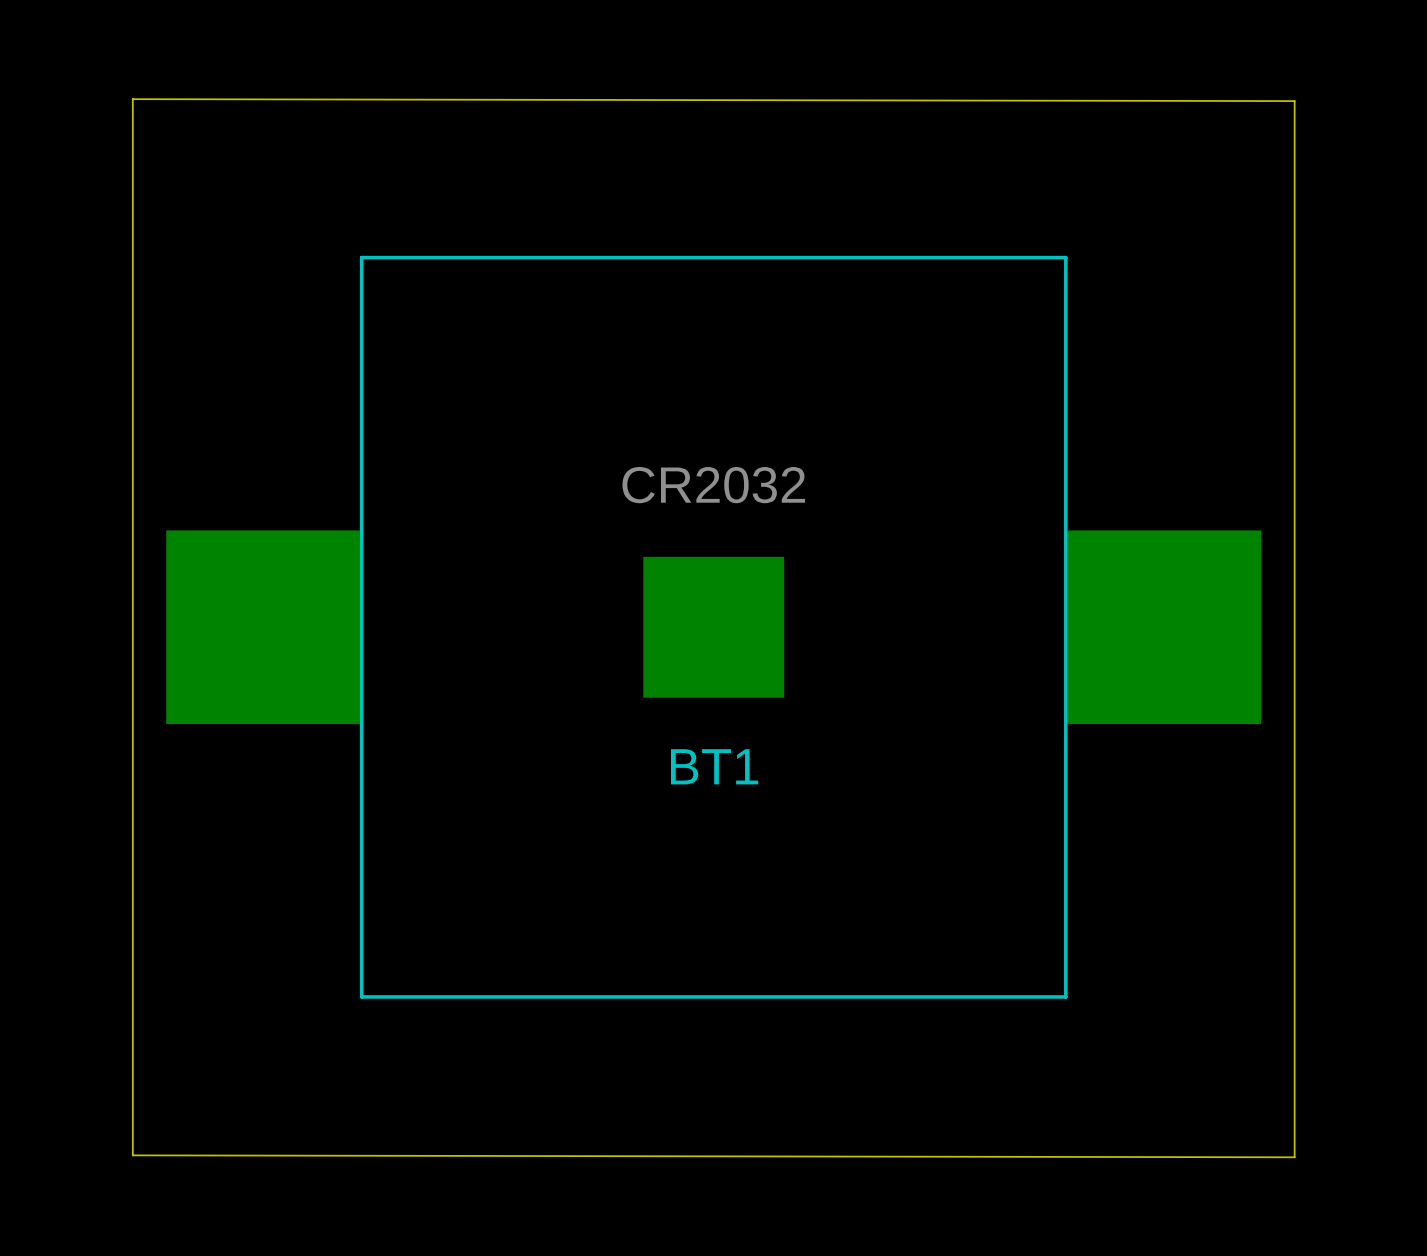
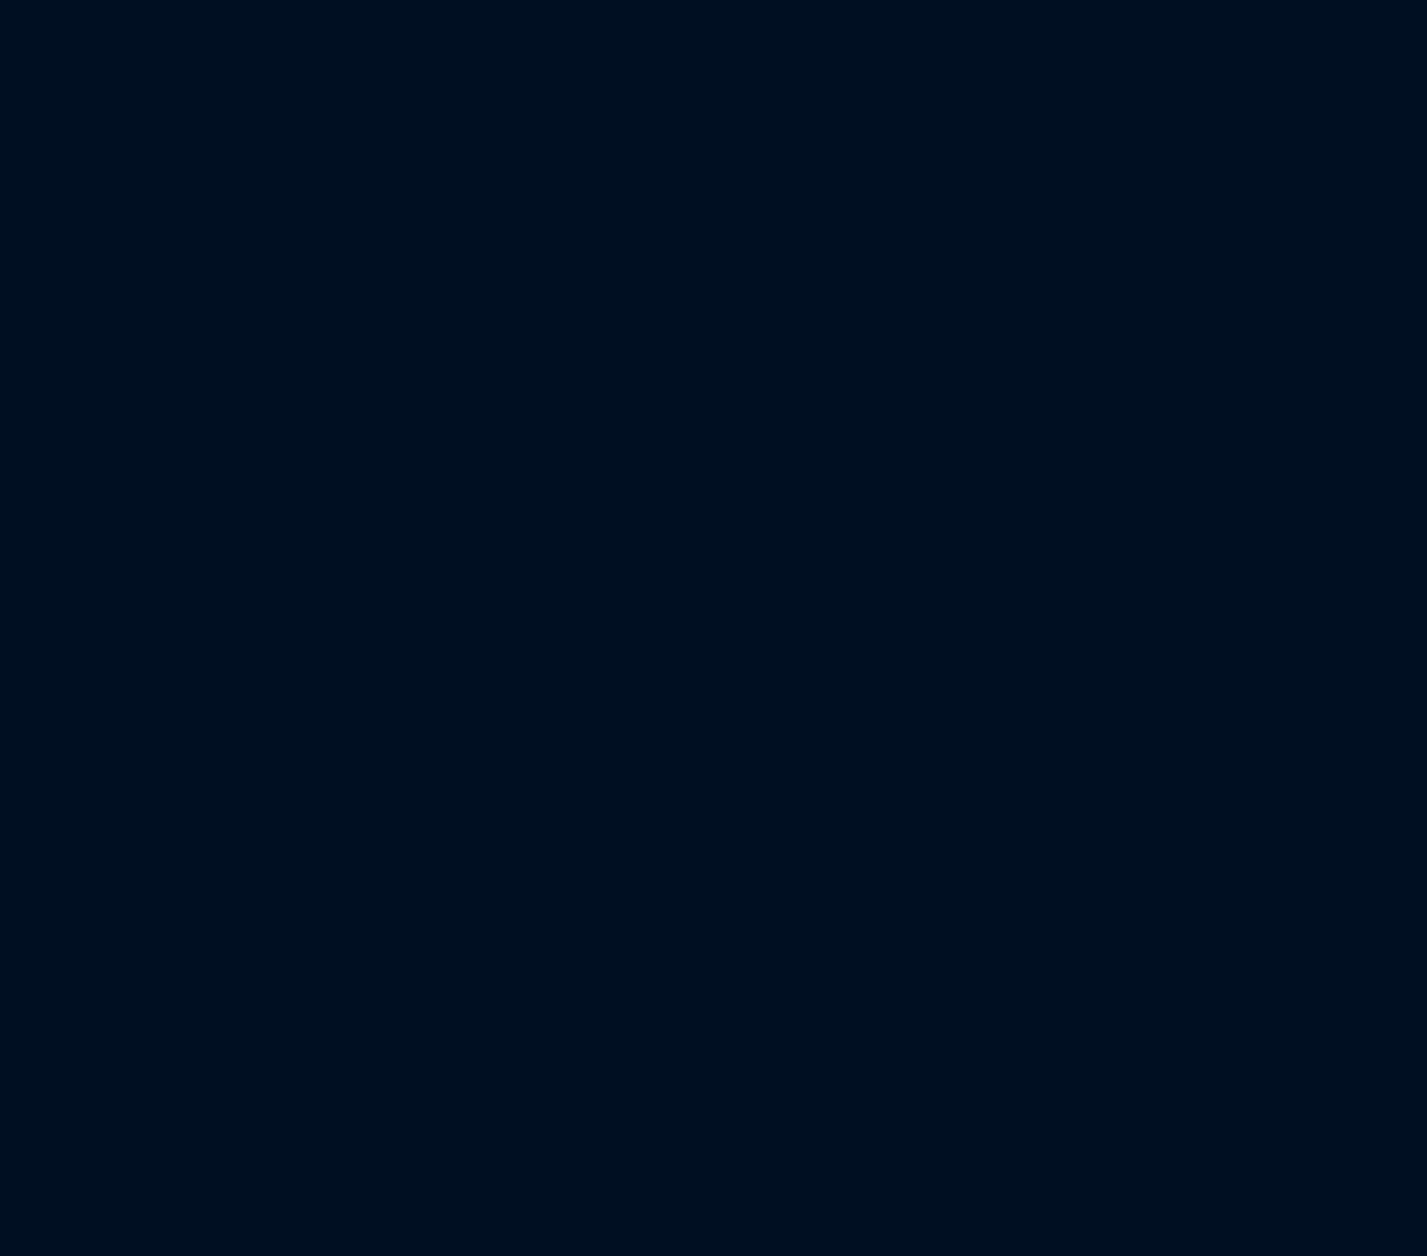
board edge: (132, 99) (132, 1155) (1294, 1157) (1294, 101) (132, 99) -> none
BT1: CR2032 (713, 627) -> none

